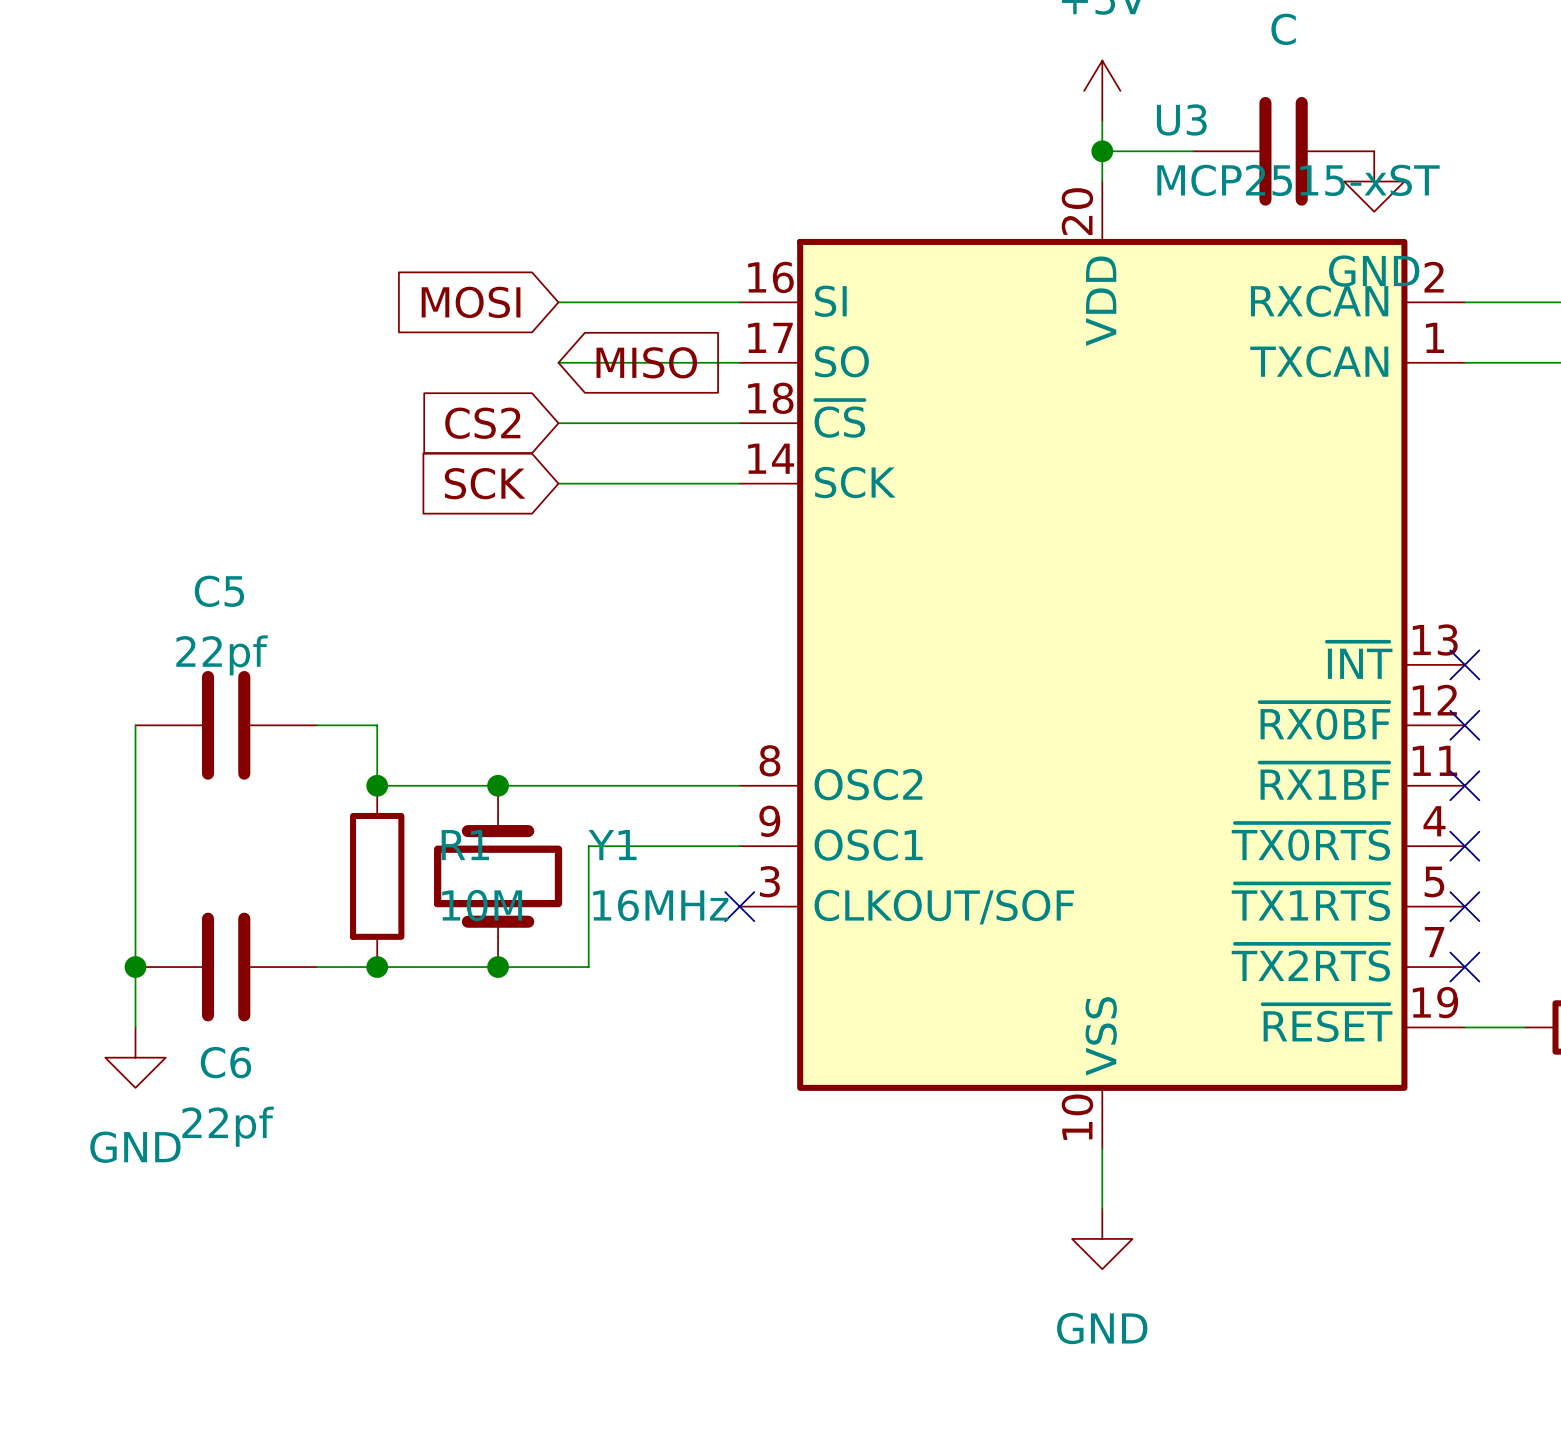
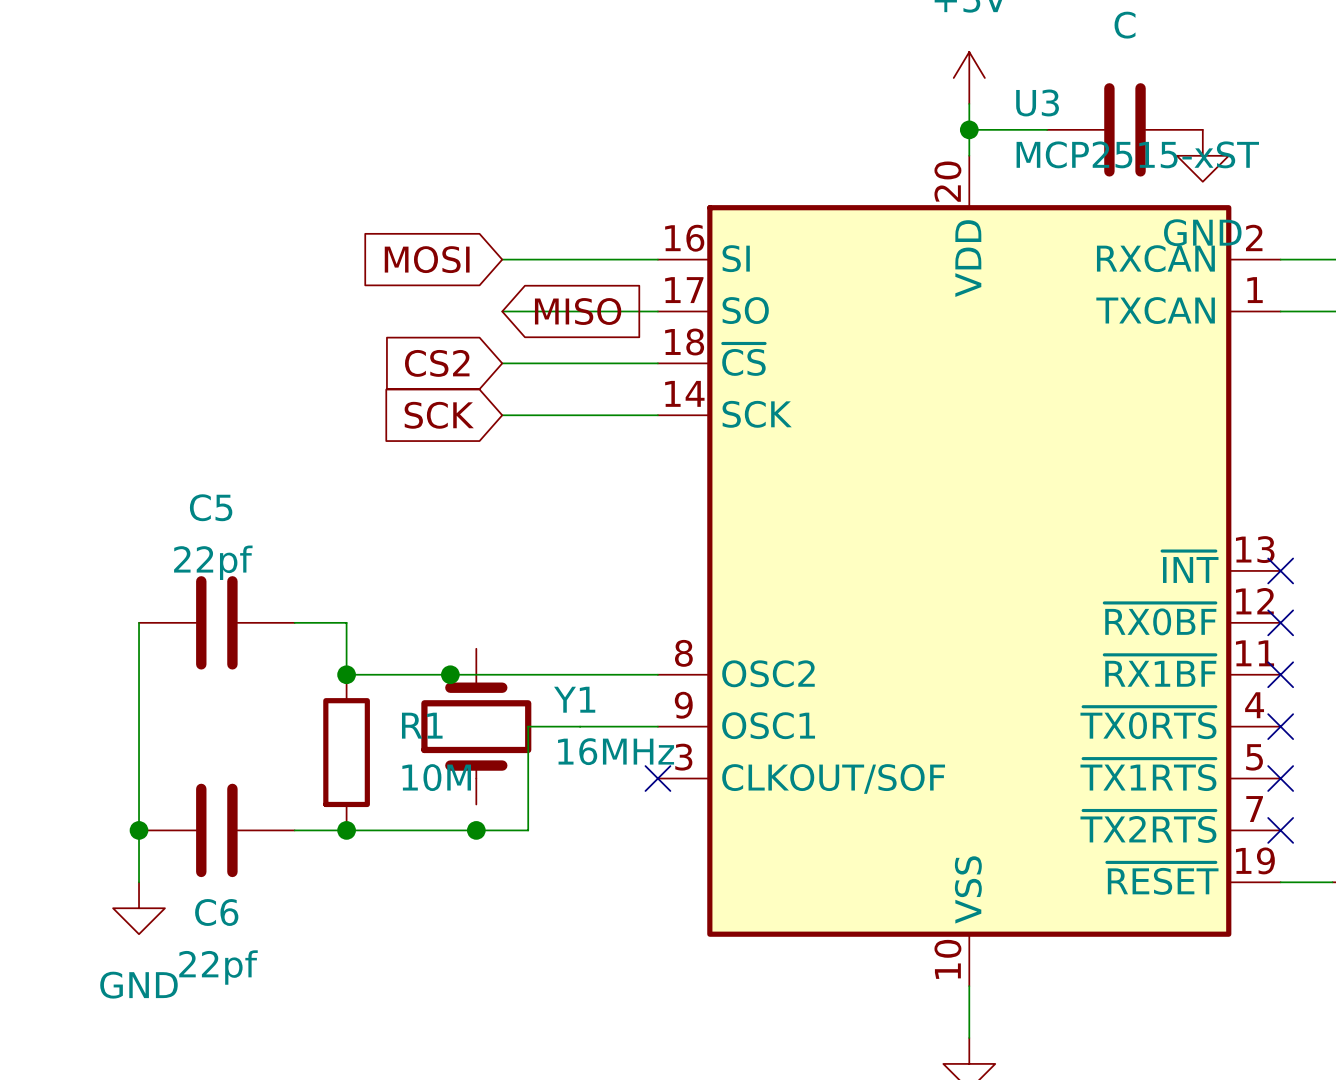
Y1 position: (498, 876) -> (476, 726)
junction position: (498, 967) -> (476, 830)

